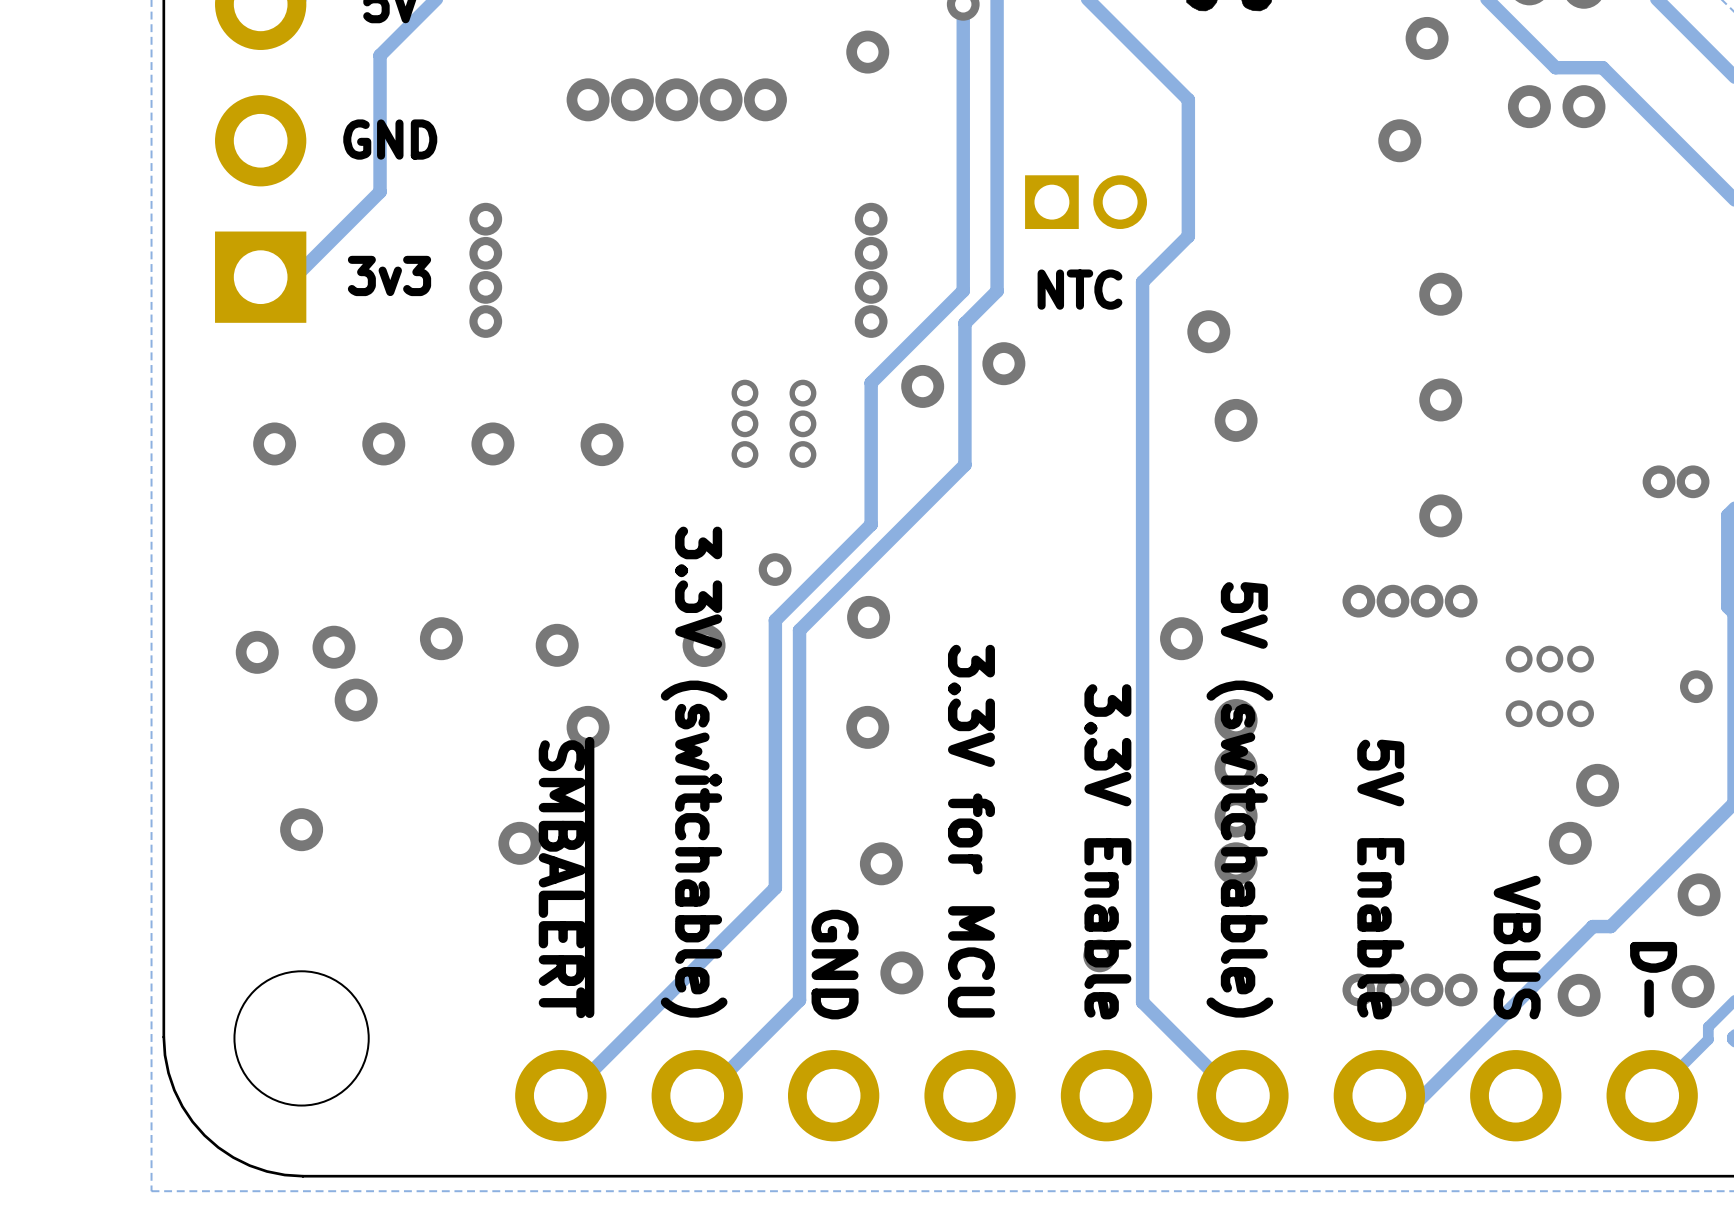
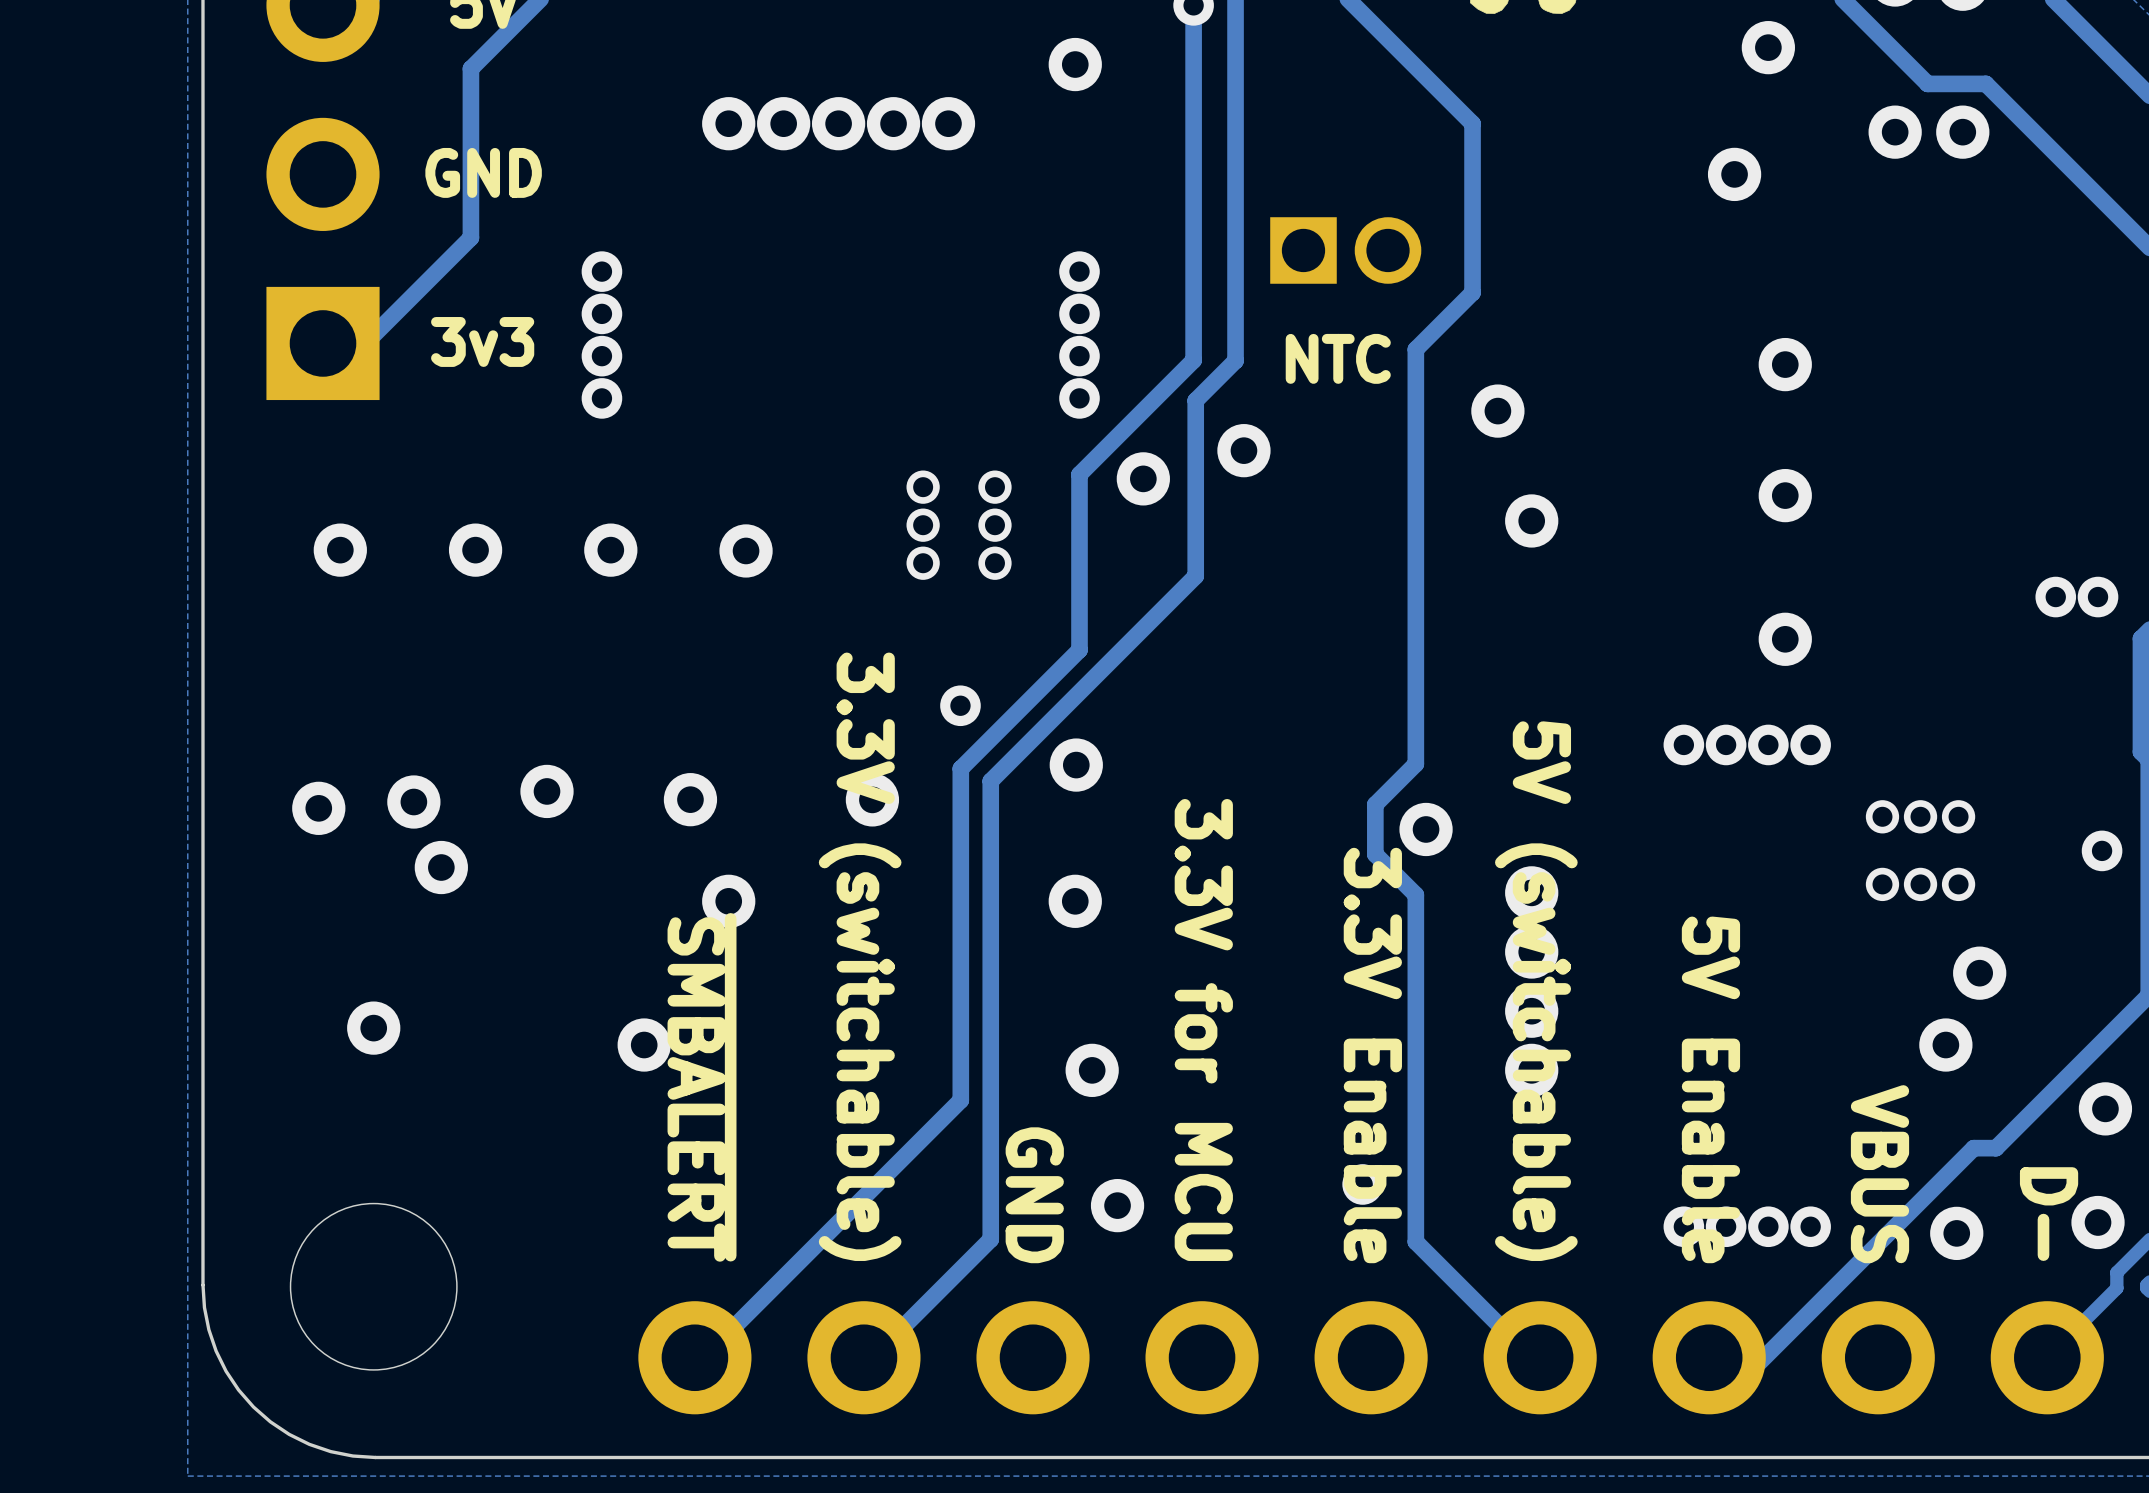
track: (1142, 616) (1142, 722) -> (1415, 764) (1375, 804) (1375, 854) (1415, 894)
via position: (1181, 638) -> (1426, 829)

